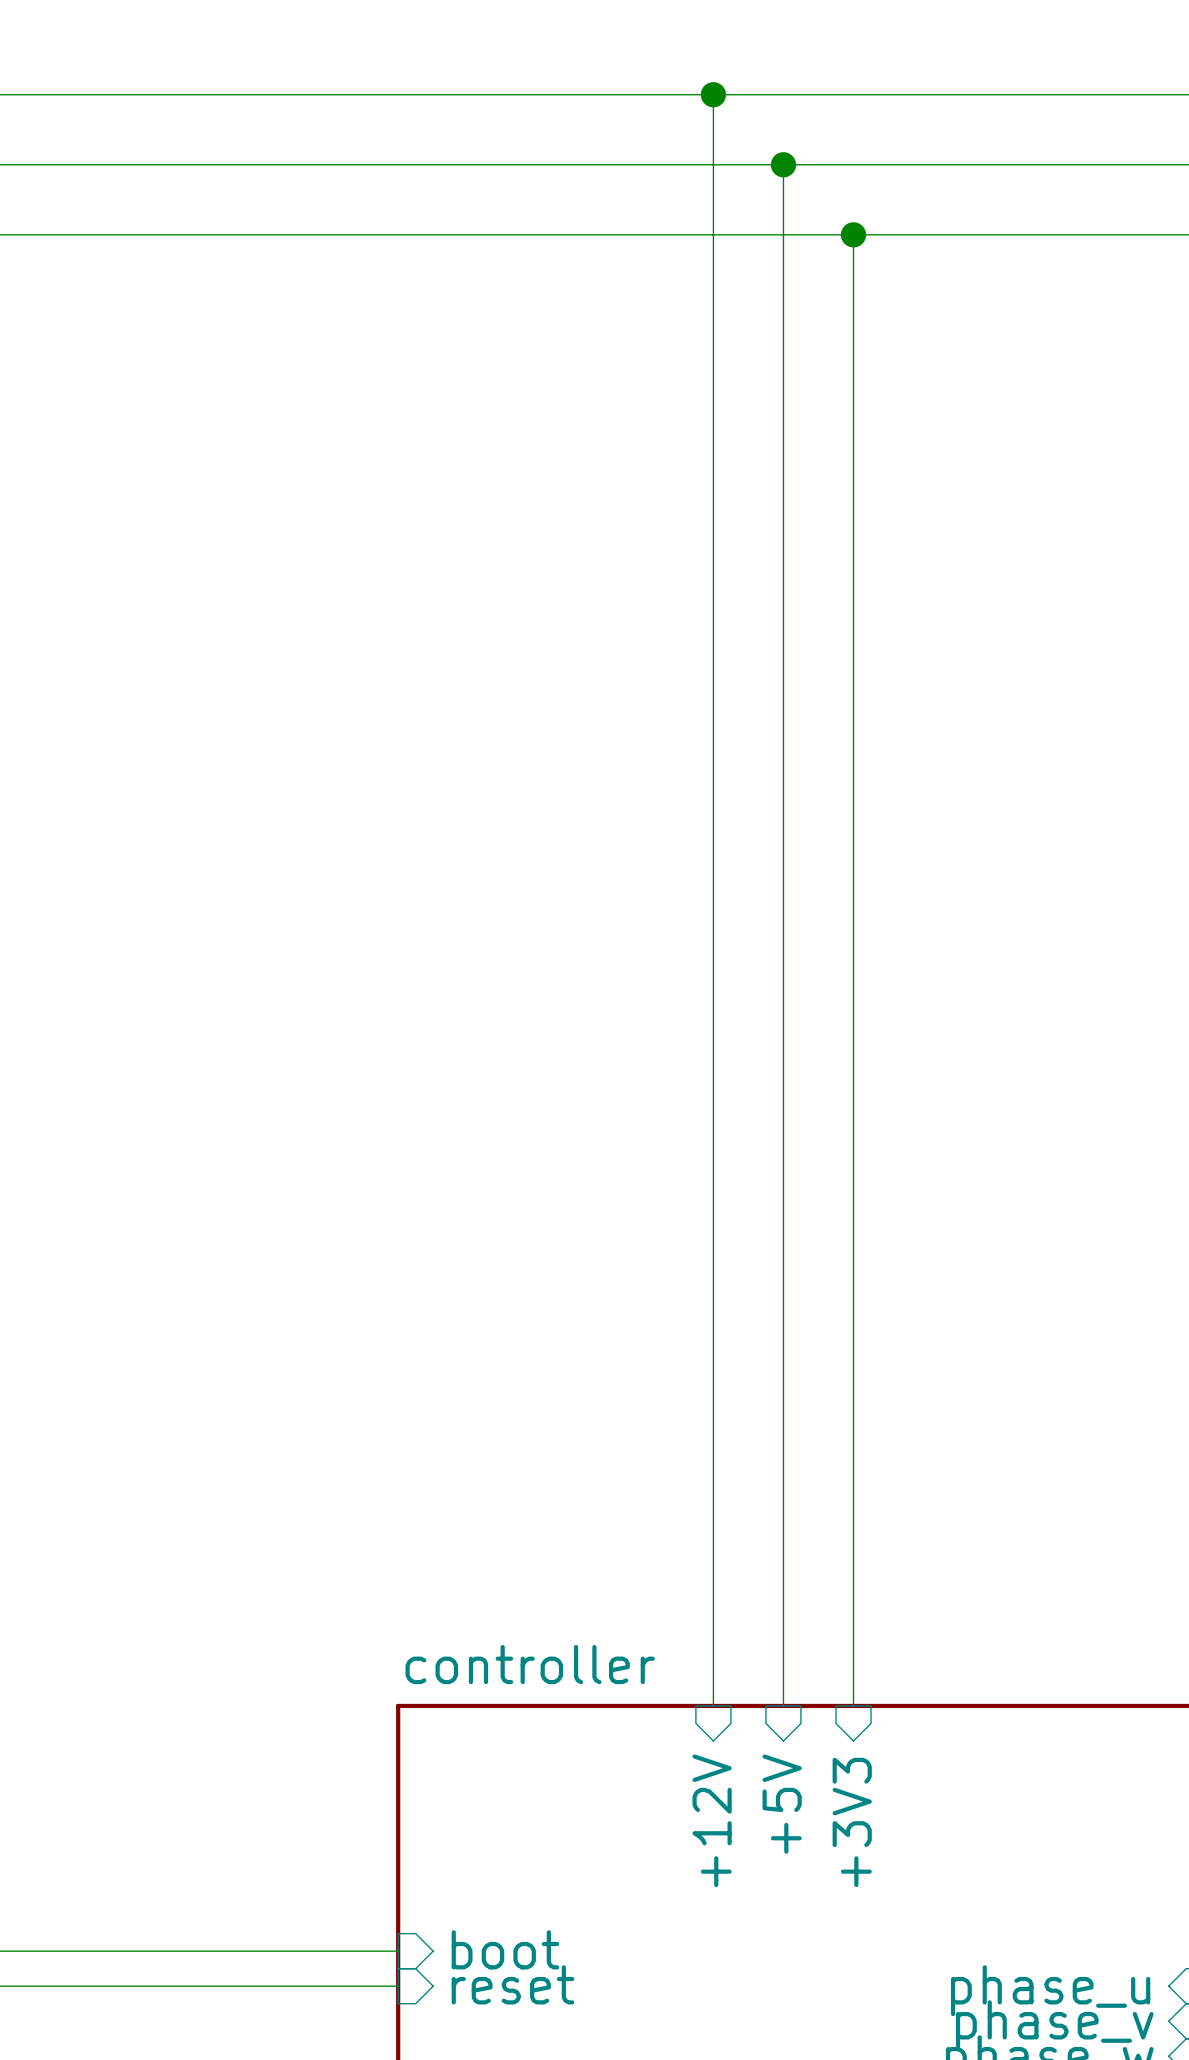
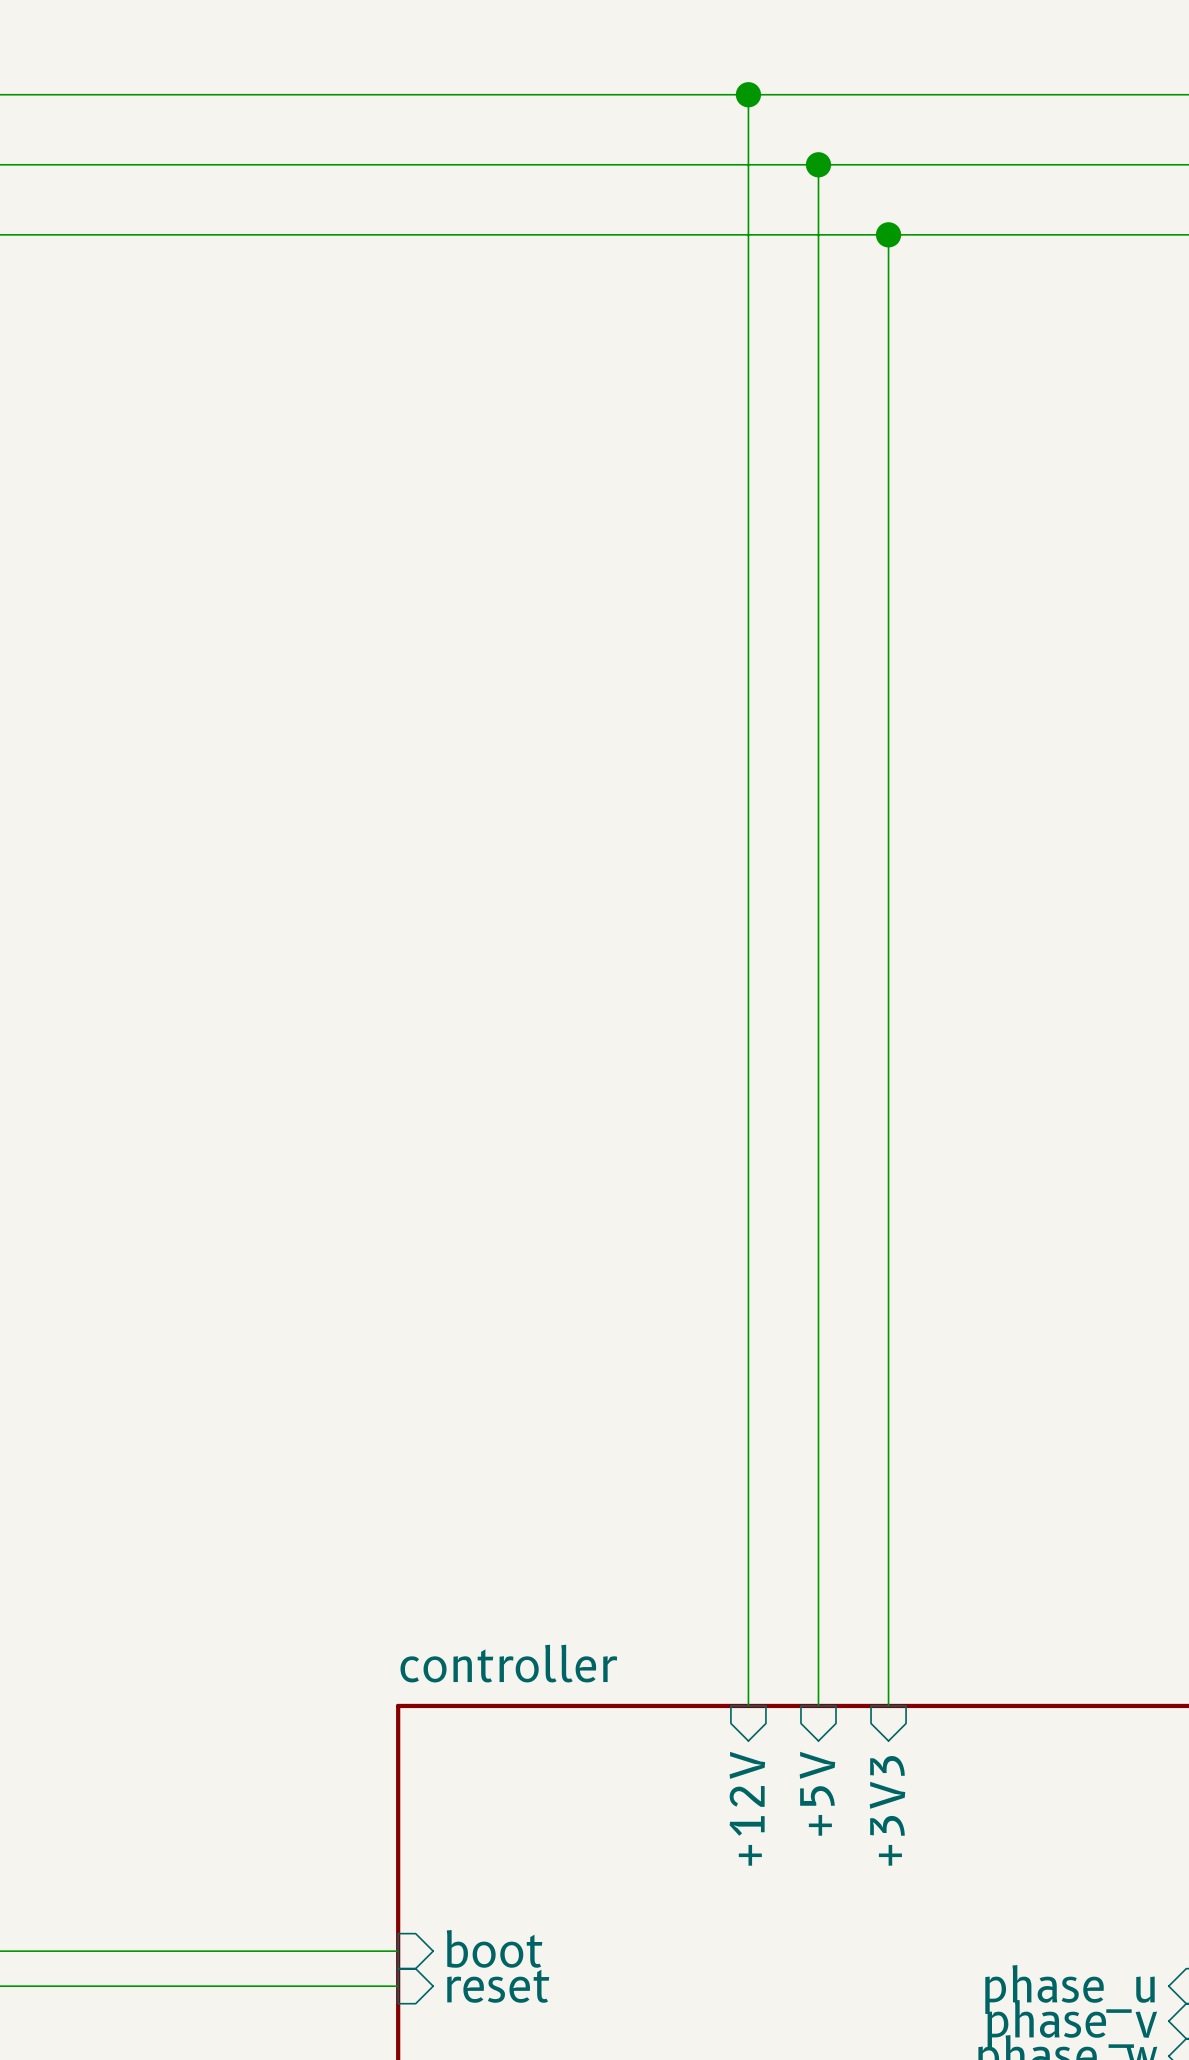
wire: (713, 94) (713, 1705) -> (748, 94) (748, 1705)
junction position: (713, 94) -> (748, 94)
wire: (783, 164) (783, 1705) -> (818, 164) (818, 1705)
junction position: (783, 164) -> (818, 164)
wire: (853, 234) (853, 1705) -> (888, 234) (888, 1705)
junction position: (853, 234) -> (888, 234)
sheet pin position: +5V (782, 1804) -> +5V (817, 1793)
sheet pin position: +12V (712, 1820) -> +12V (747, 1808)
sheet pin position: +3V3 (852, 1822) -> +3V3 (887, 1810)

